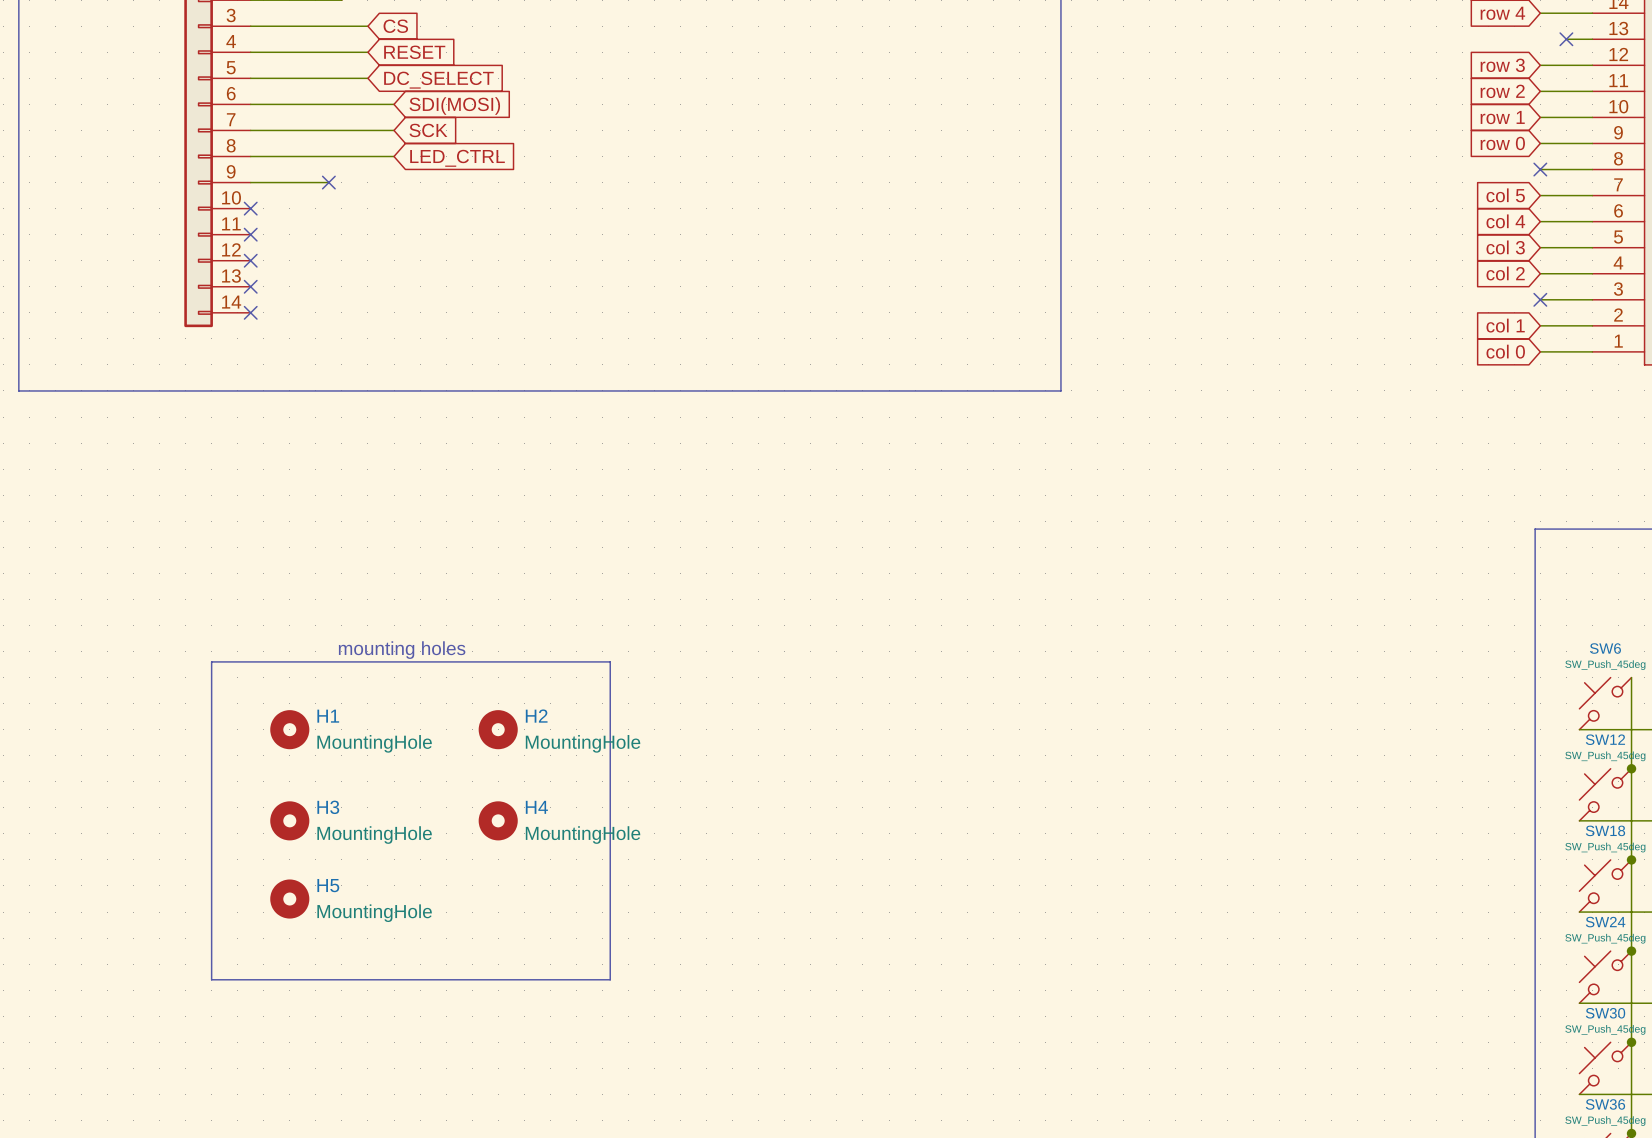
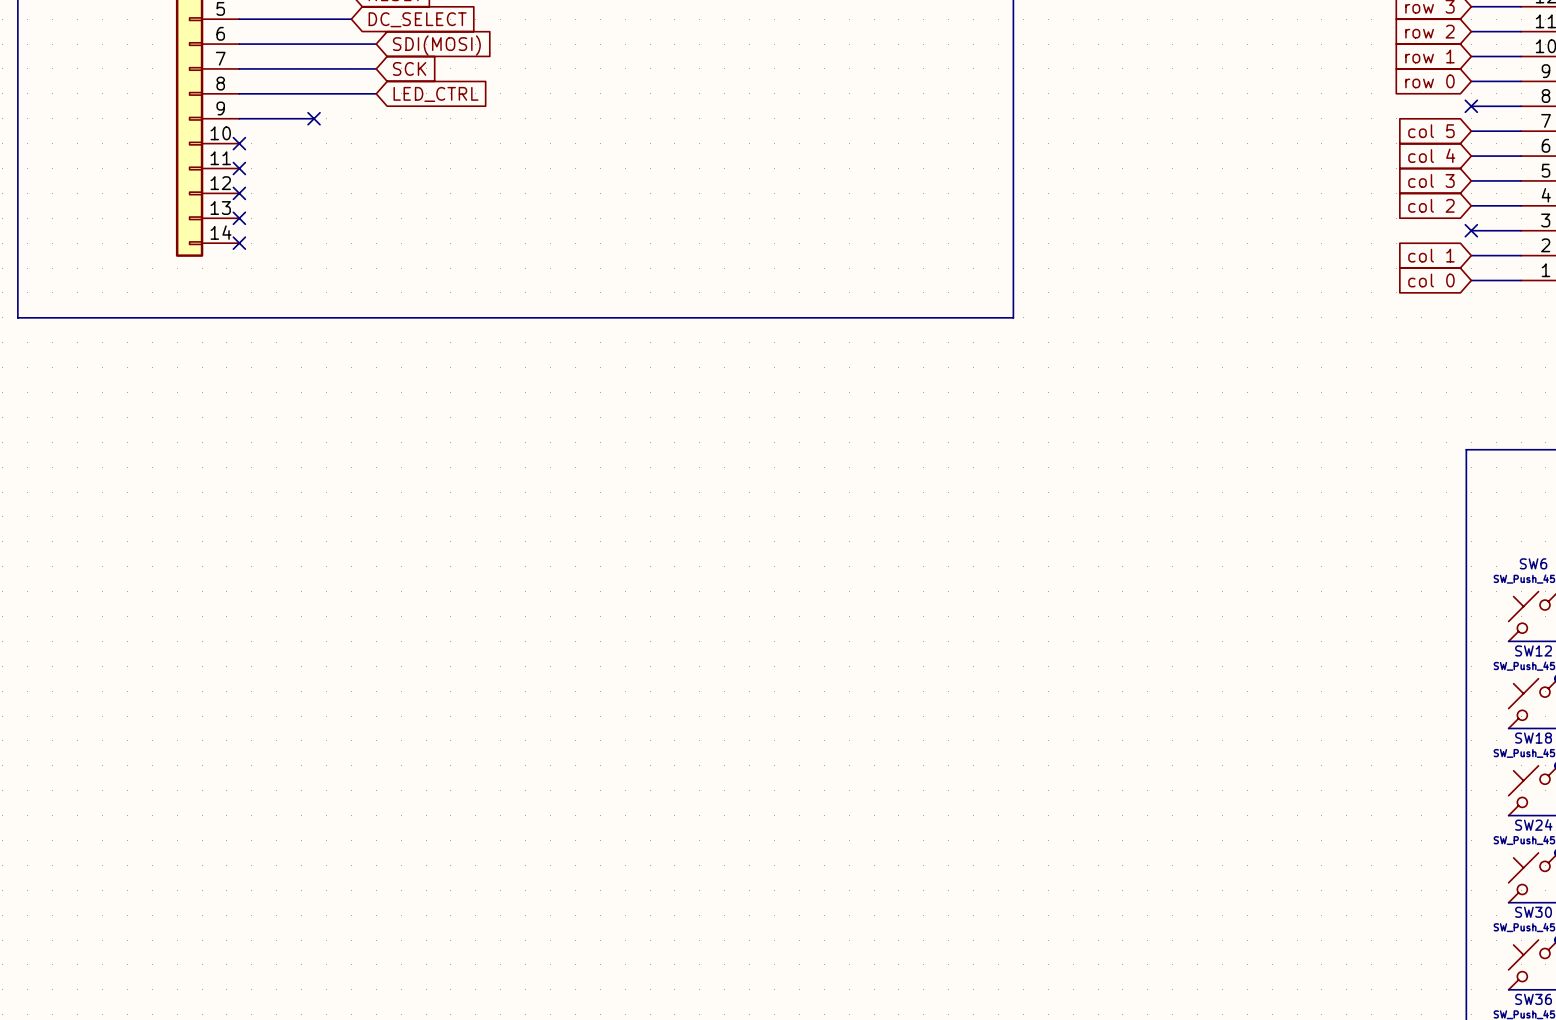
text: mounting holes (402, 650) -> none
line: (211, 661) (610, 661) (610, 979) (211, 979) (211, 661) -> none
H1: MountingHole (289, 729) -> none
H2: MountingHole (498, 729) -> none
H3: MountingHole (289, 820) -> none
H4: MountingHole (498, 820) -> none
H5: MountingHole (289, 899) -> none

